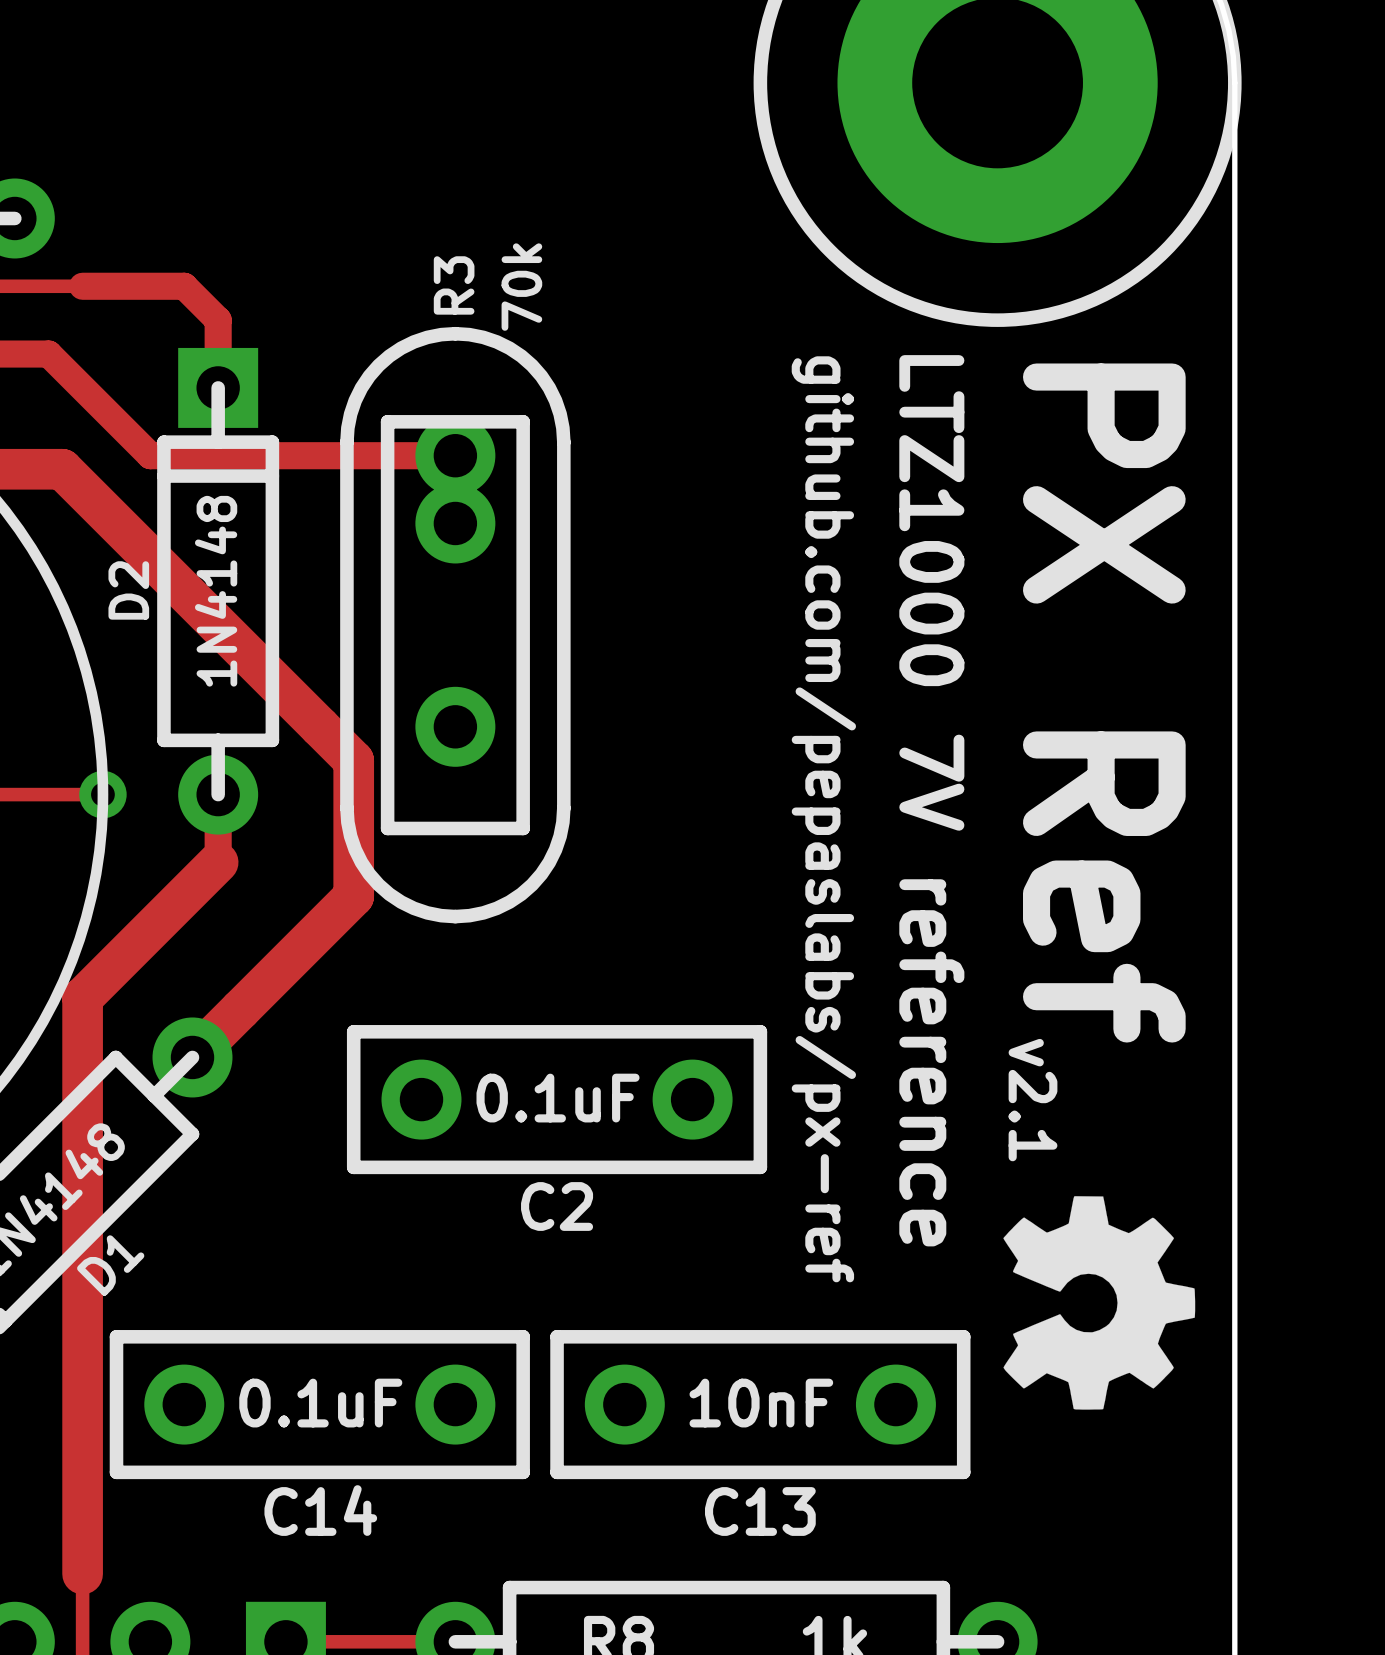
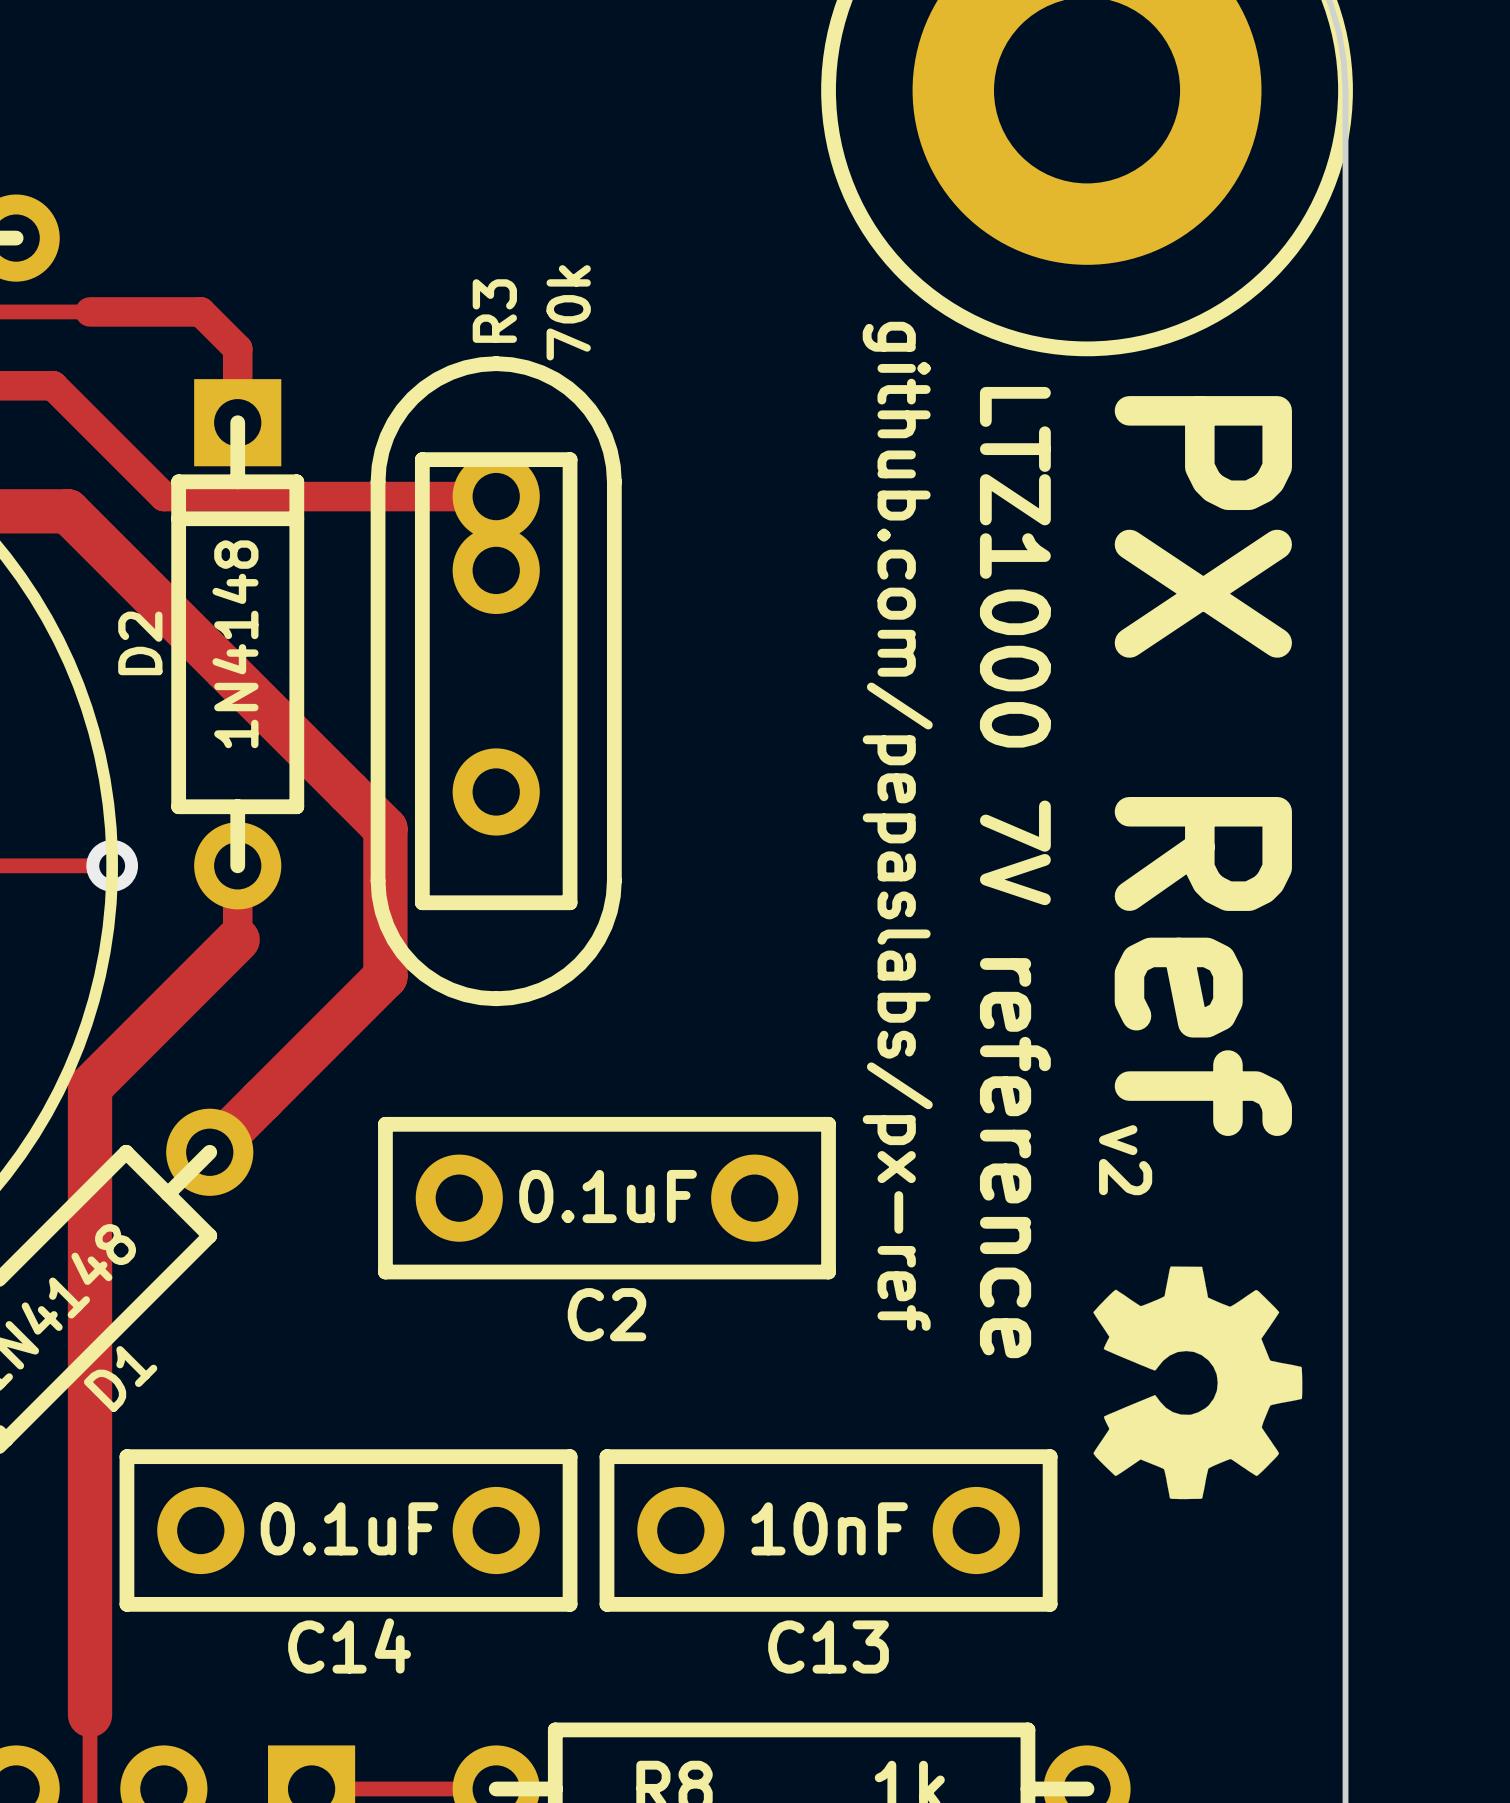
text position: github.com/pepaslabs/px-ref (823, 819) -> github.com/pepaslabs/px-ref (897, 826)
text: v2.1 (1033, 1100) -> v2 (1125, 1160)
drawing position: (1099, 1302) -> (1197, 1382)

